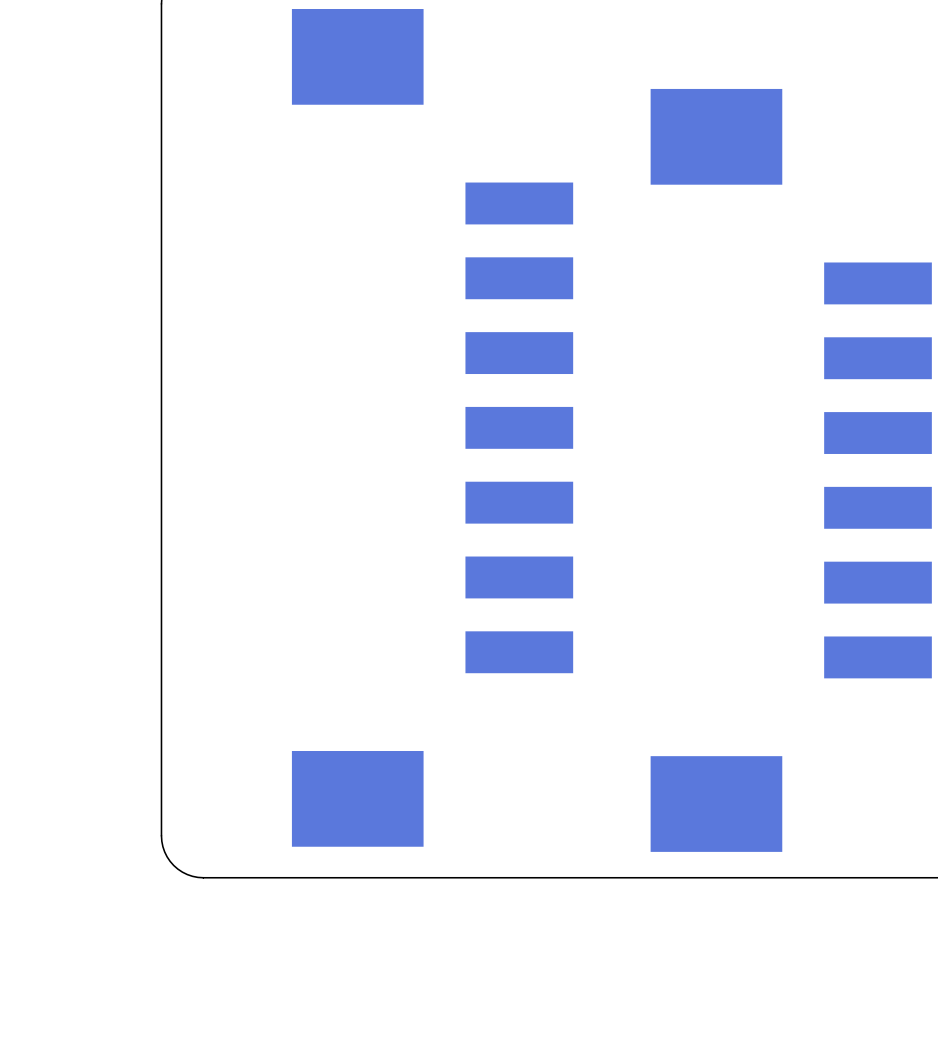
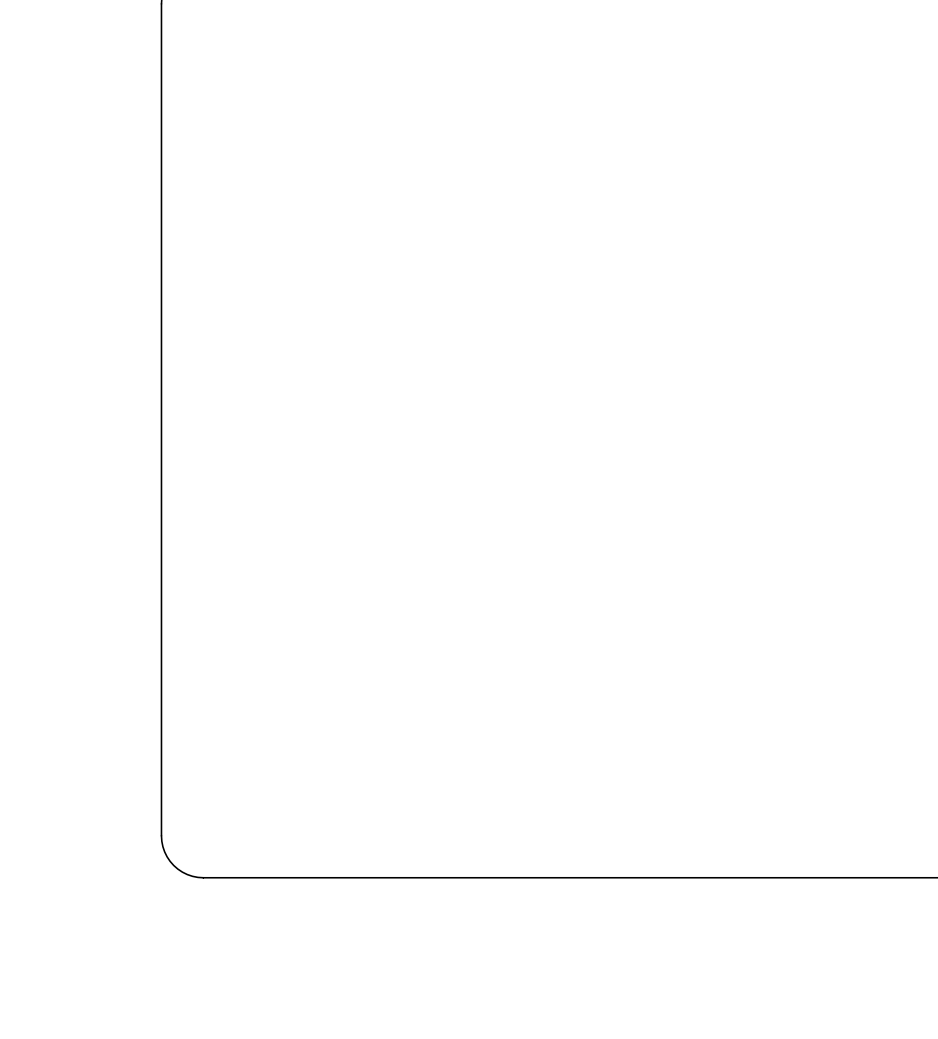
part: (432, 427) -> none
part: (791, 470) -> none

